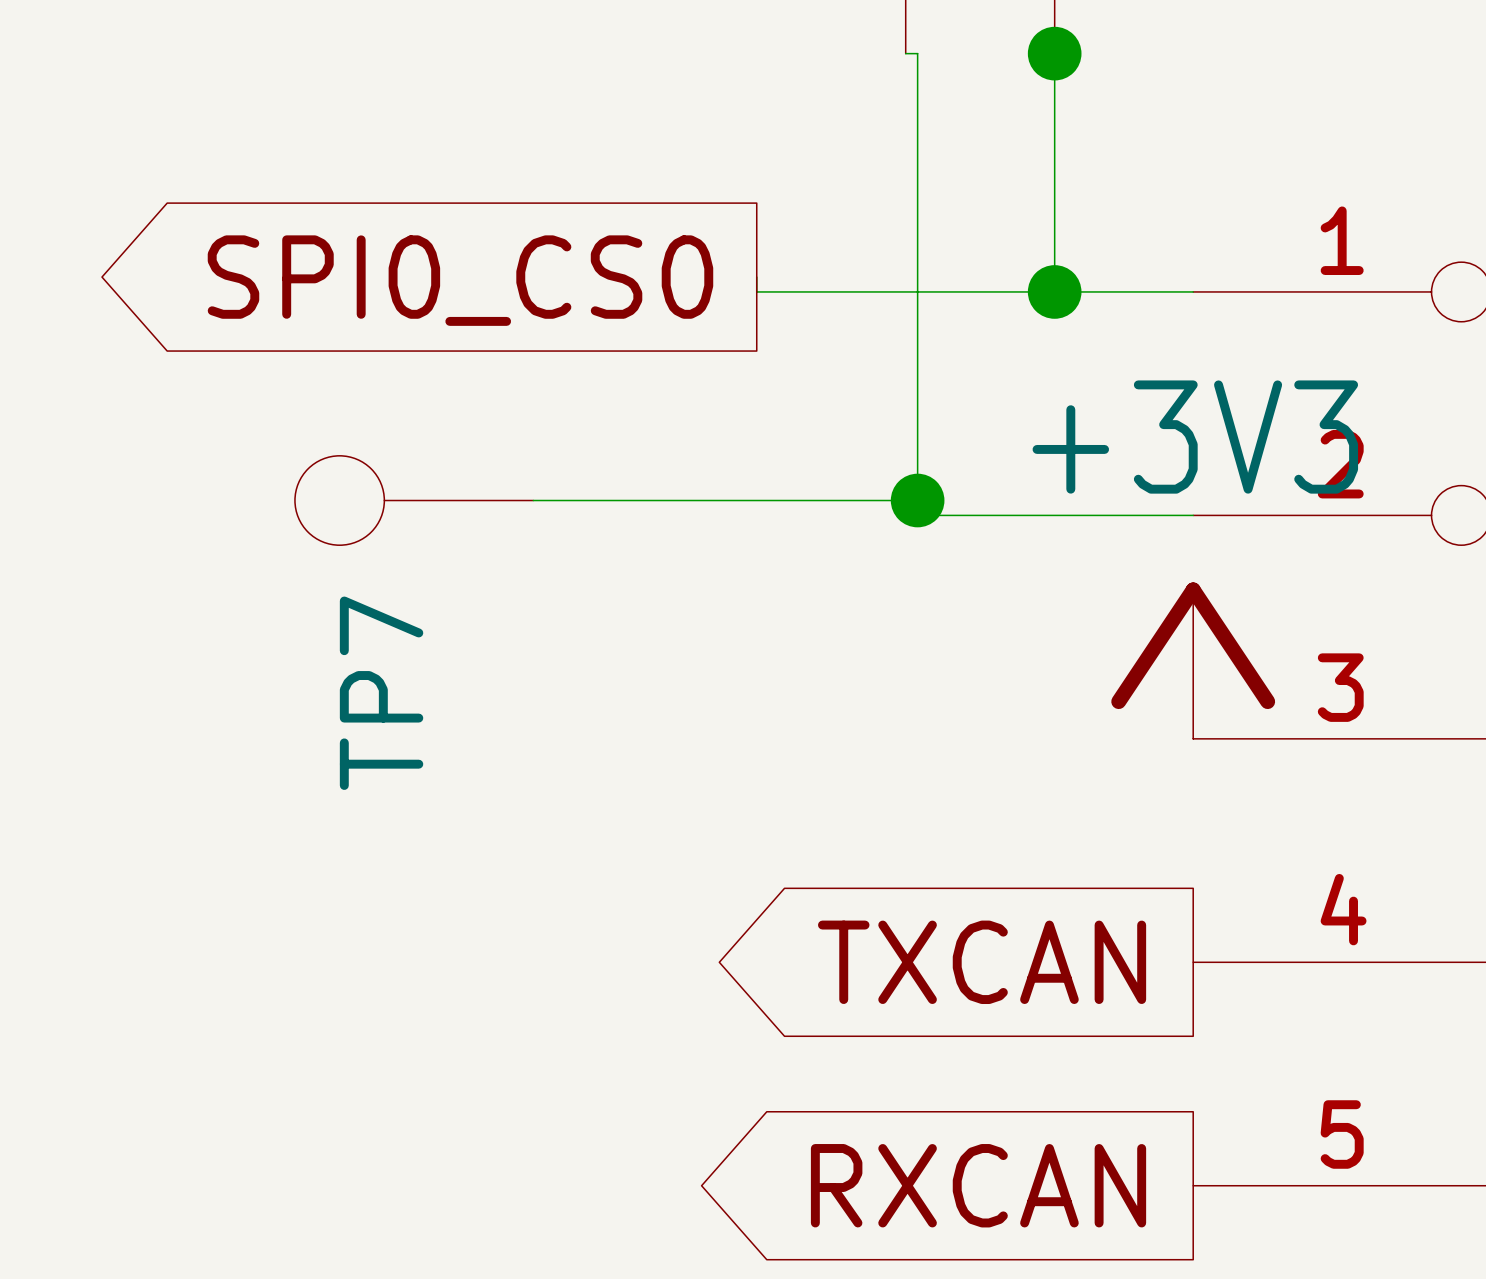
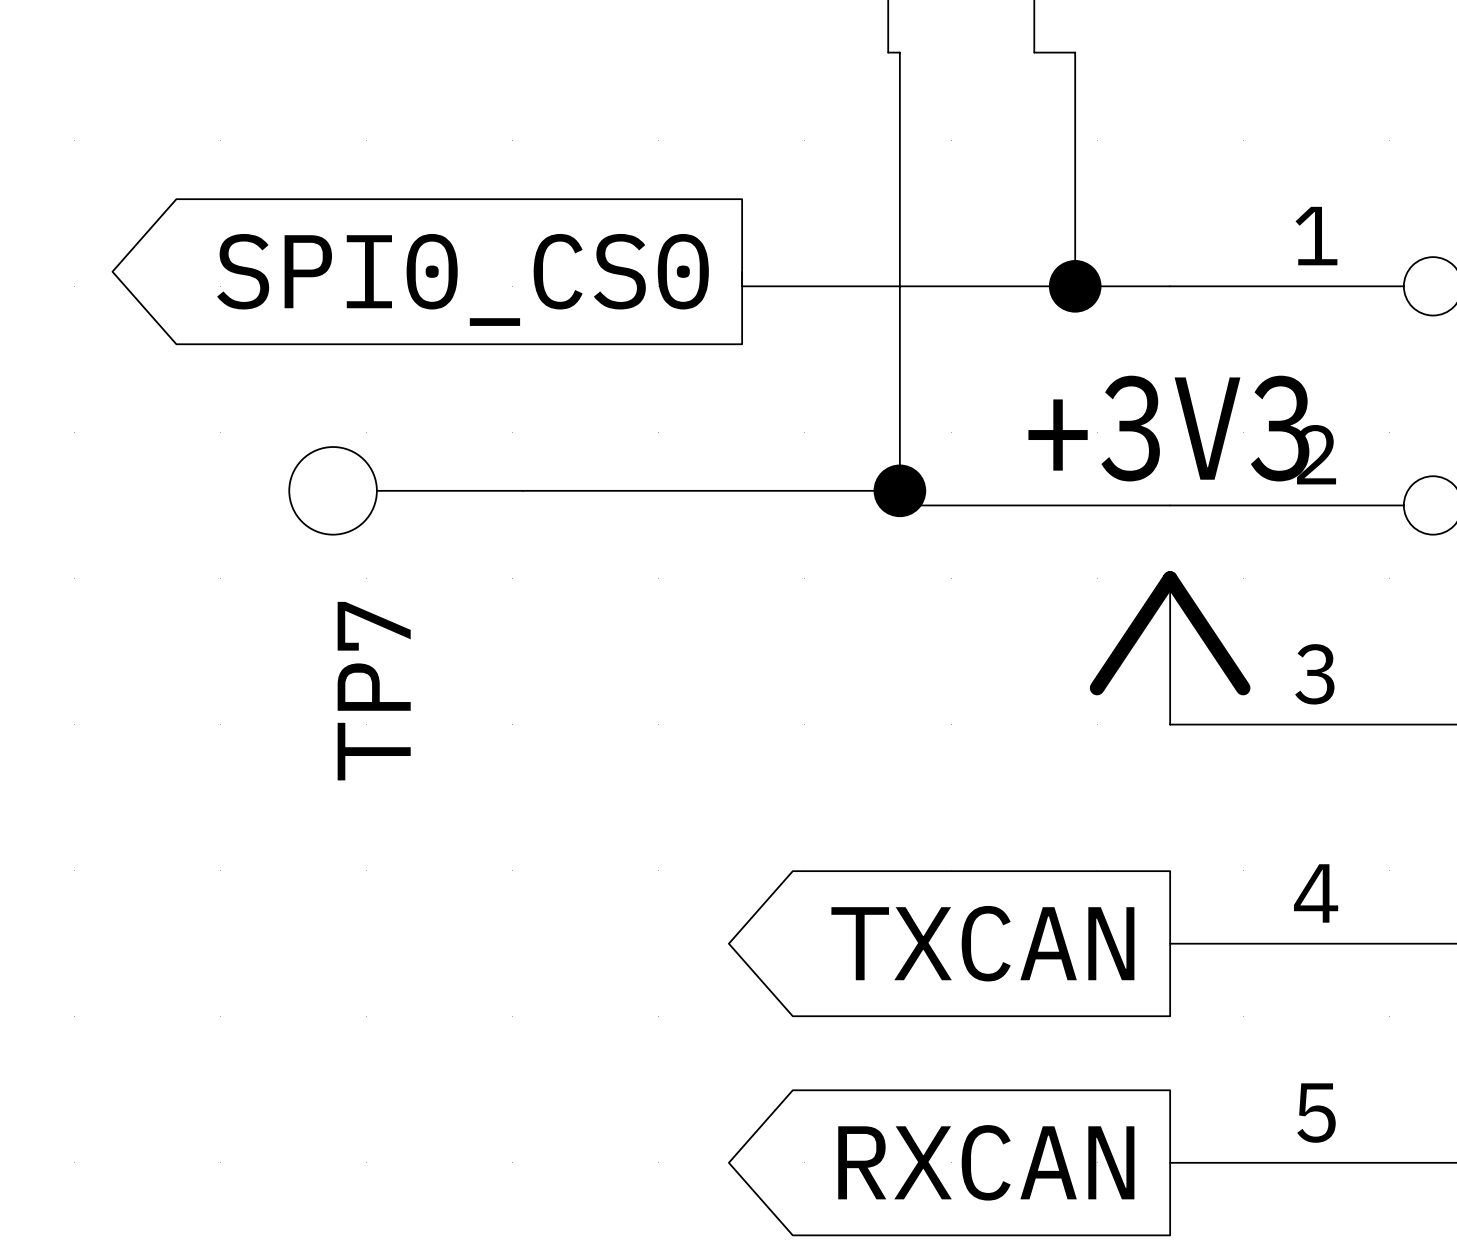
wire: (1054, 38) (1054, 291) -> none
wire: none -> (1034, 52) (1075, 52) (1075, 286)
junction: (1054, 53) -> none
junction position: (1054, 291) -> (1075, 286)

